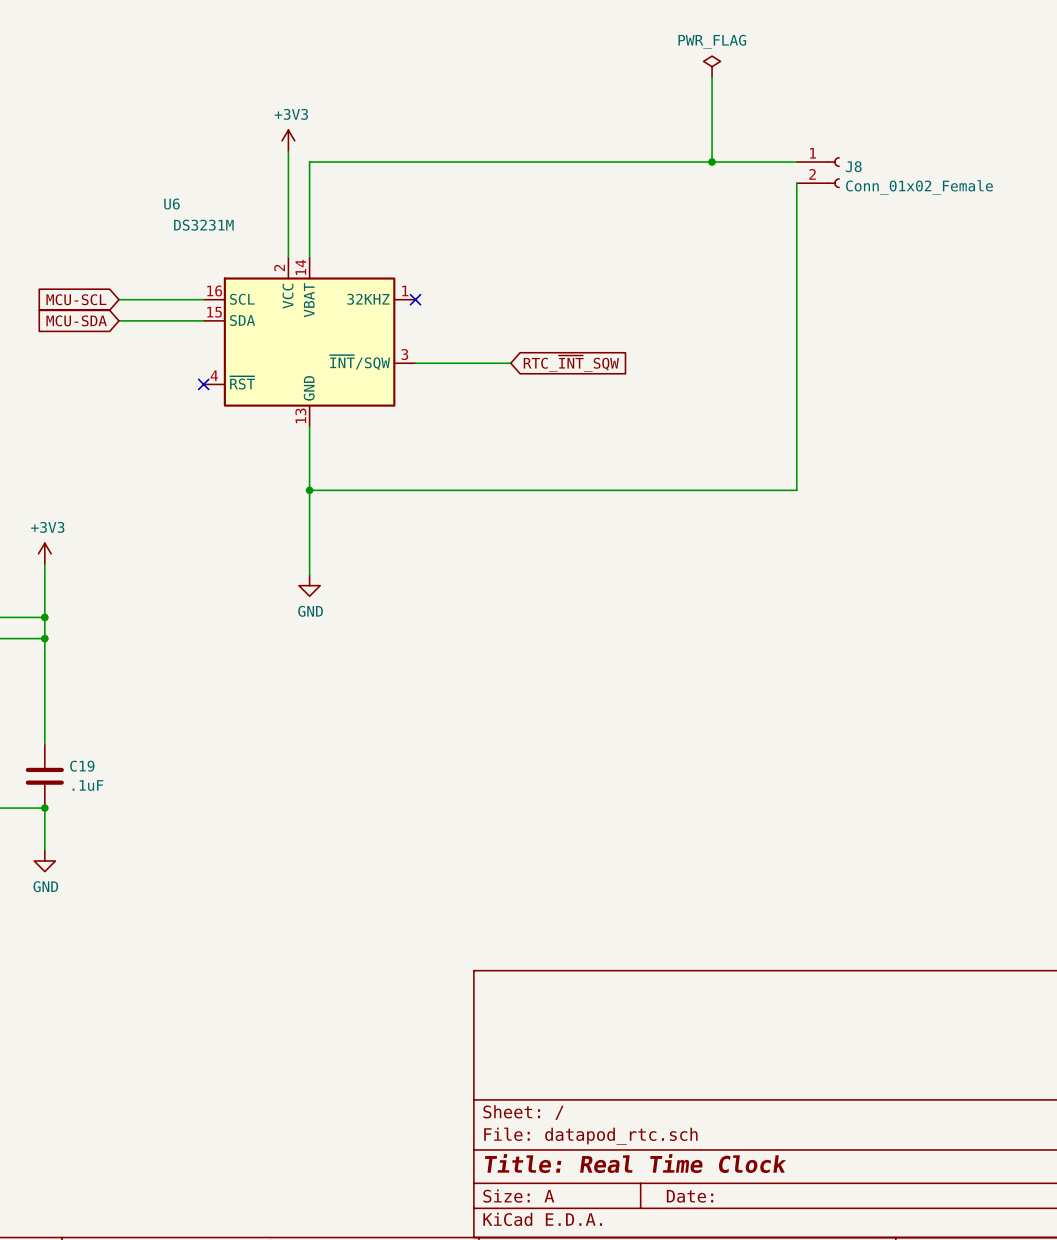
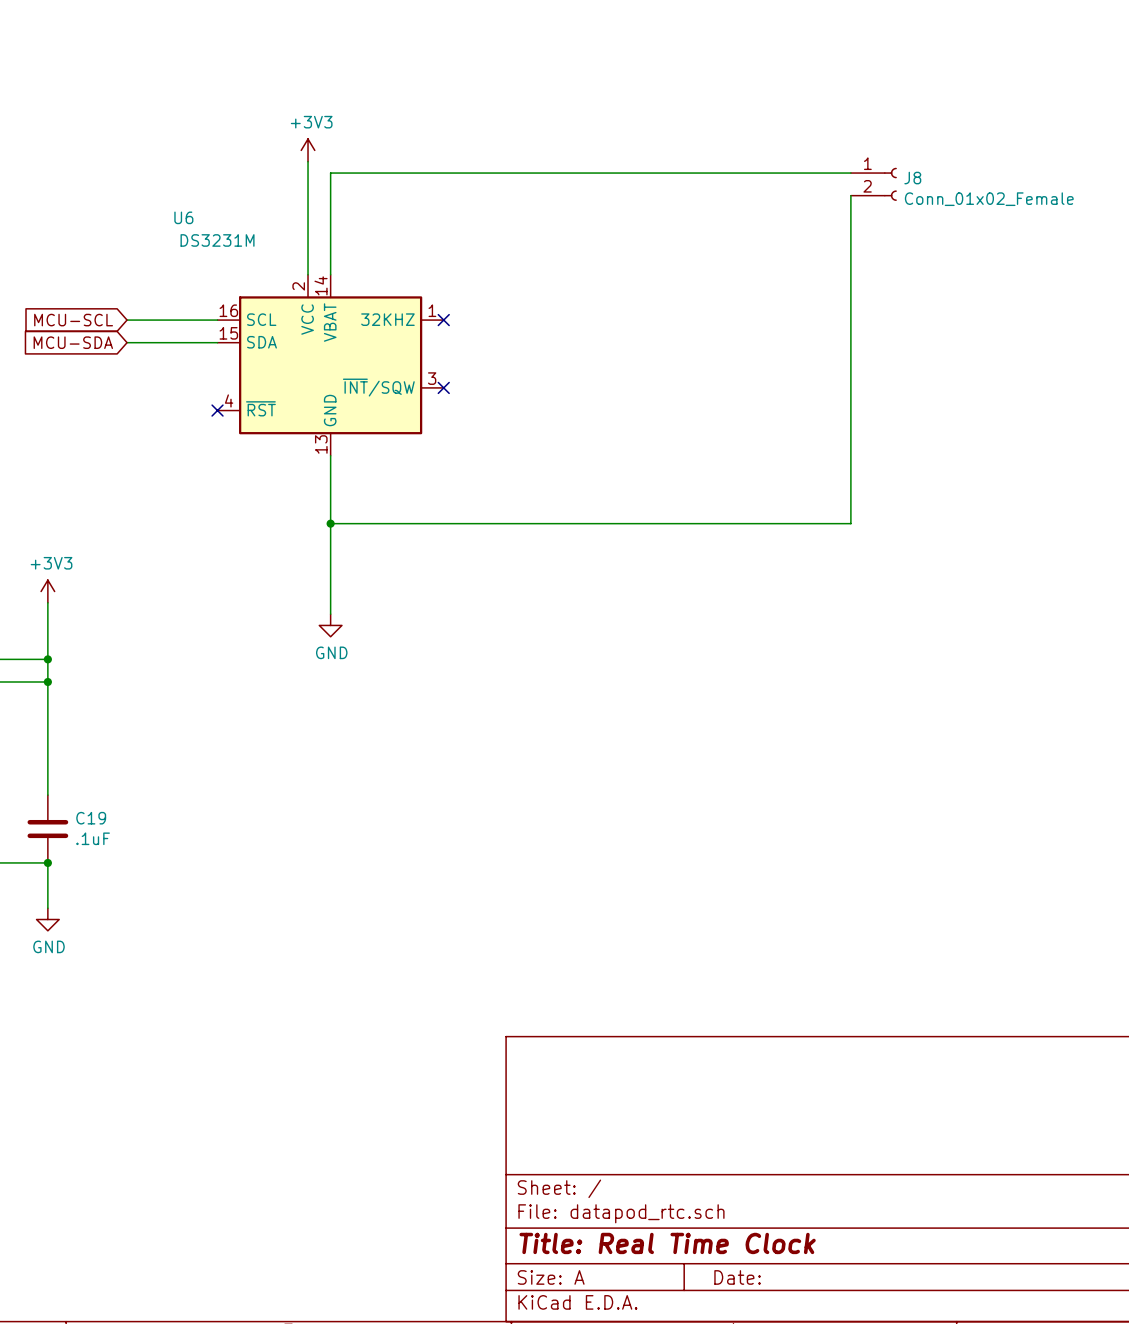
power symbol: PWR_FLAG (712, 66) -> none
wire: (712, 77) (712, 162) -> none
junction: (712, 162) -> none
wire: (415, 363) (510, 363) -> none
no-connect mark: none -> (443, 387)
global label: RTC_~{INT}_SQW (571, 363) -> none

